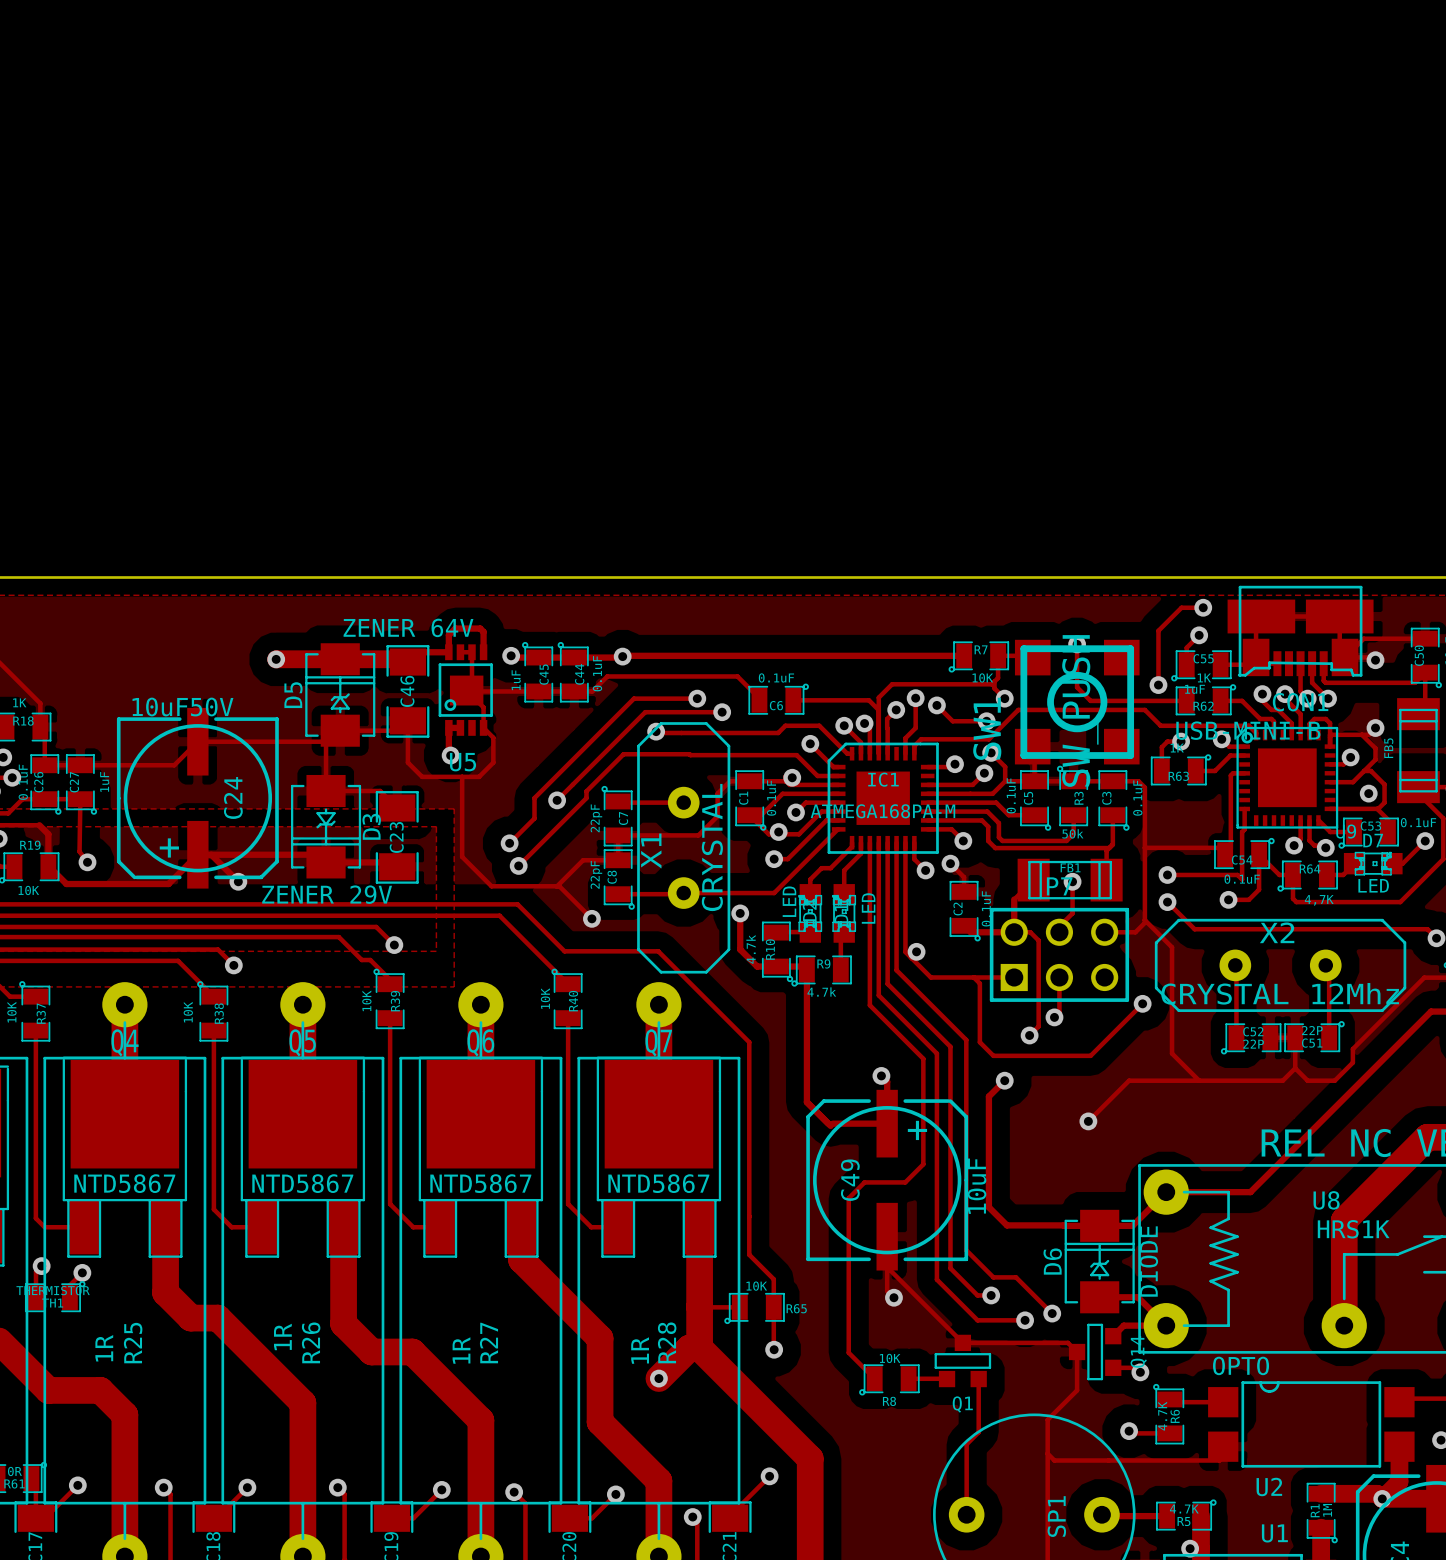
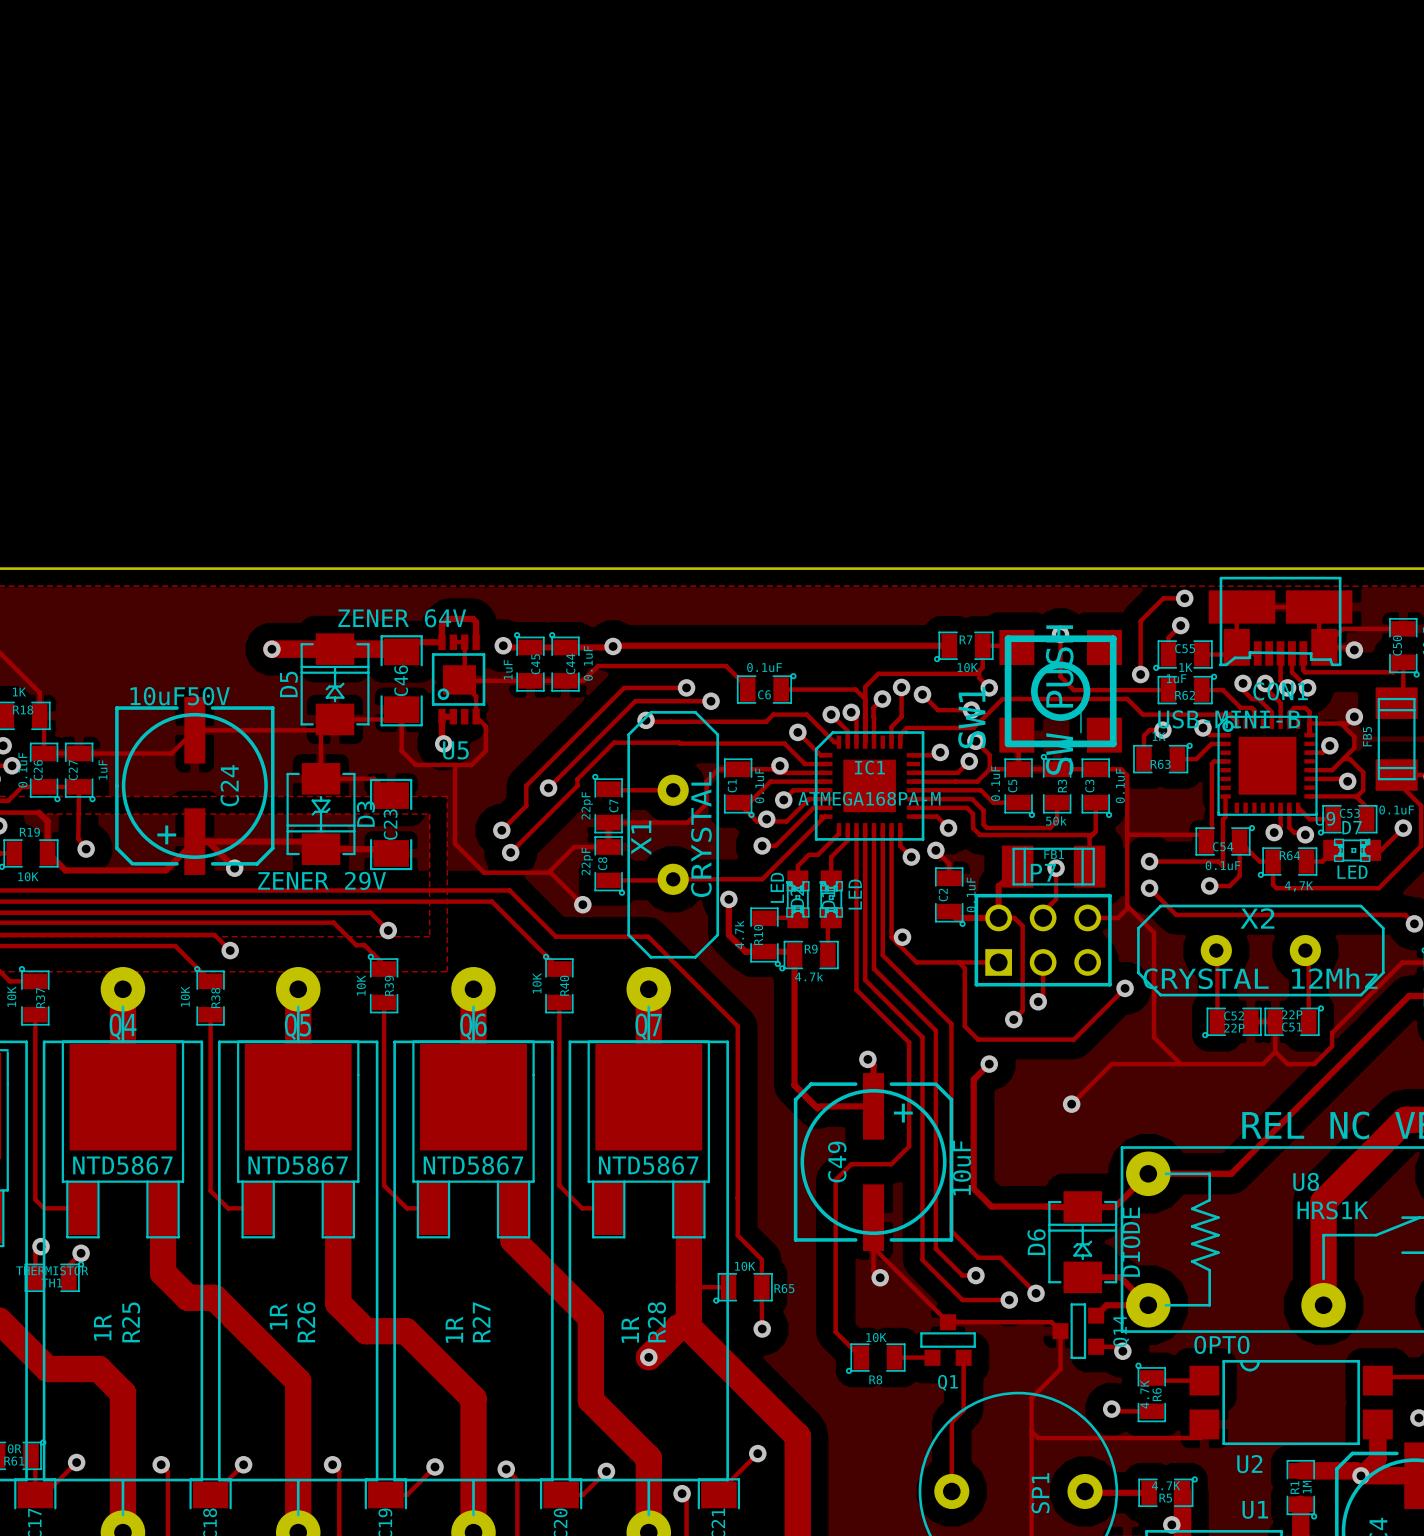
track: none -> (1309, 778) (1345, 778)

